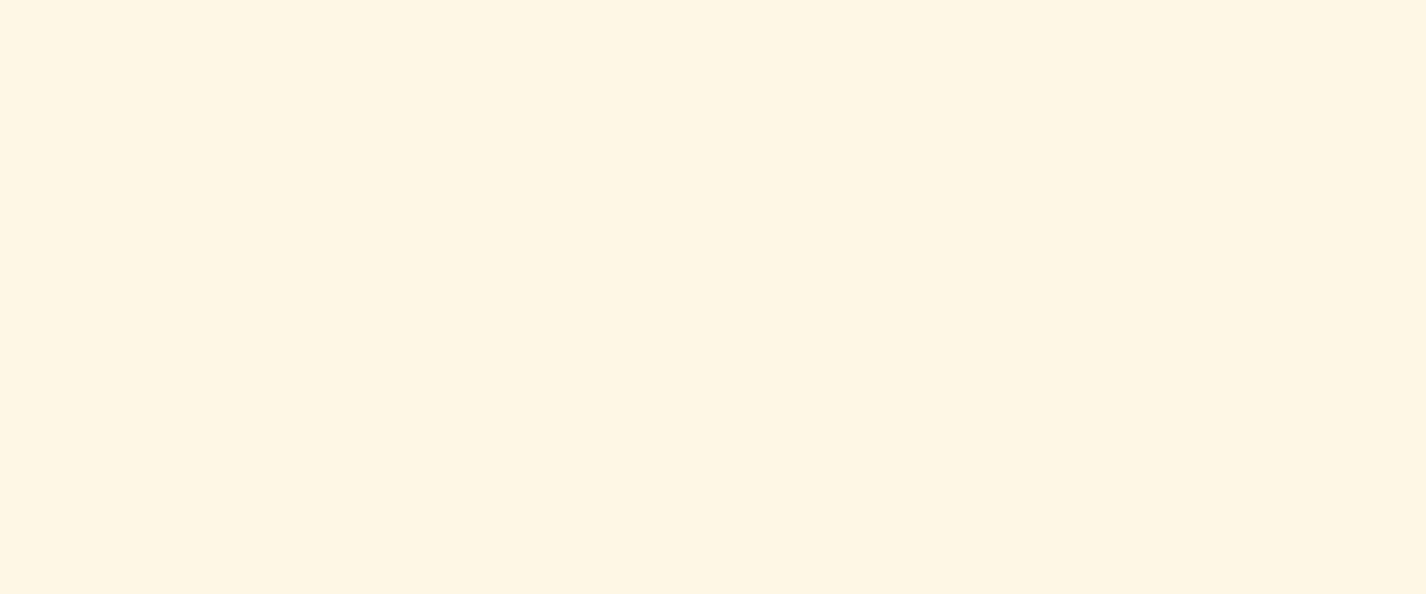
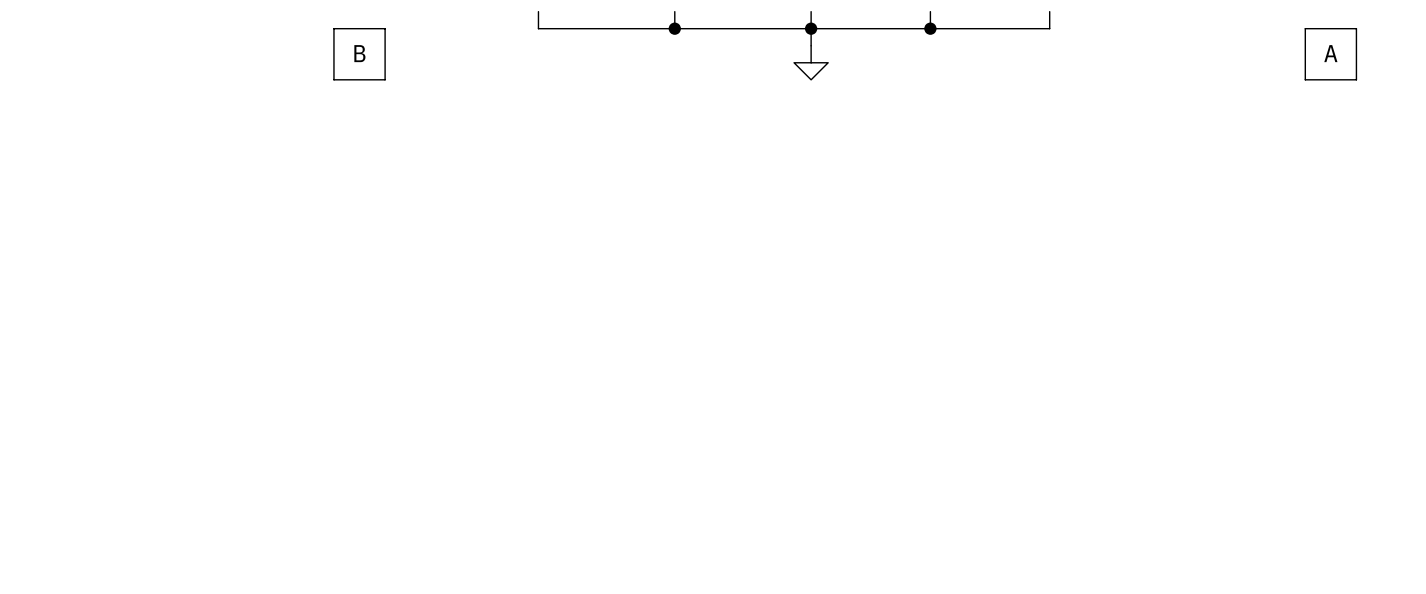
wire: none -> (538, 11) (538, 28) (1049, 28) (1049, 11)
wire: none -> (674, 11) (674, 28)
wire: none -> (811, 11) (811, 45)
wire: none -> (930, 11) (930, 28)
line: none -> (333, 28) (385, 28) (385, 79) (333, 79) (333, 28)
junction: none -> (674, 28)
junction: none -> (811, 28)
junction: none -> (930, 28)
line: none -> (1305, 28) (1356, 28) (1356, 79) (1305, 79) (1305, 28)
text: none -> B (359, 53)
text: none -> A (1330, 53)
power symbol: none -> (811, 62)

